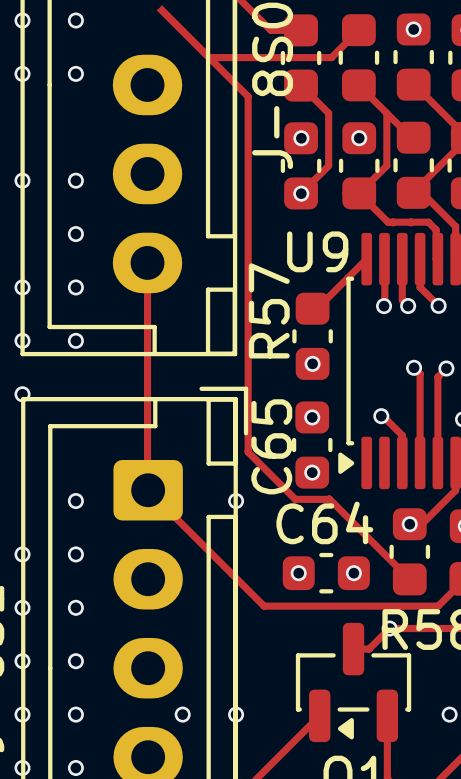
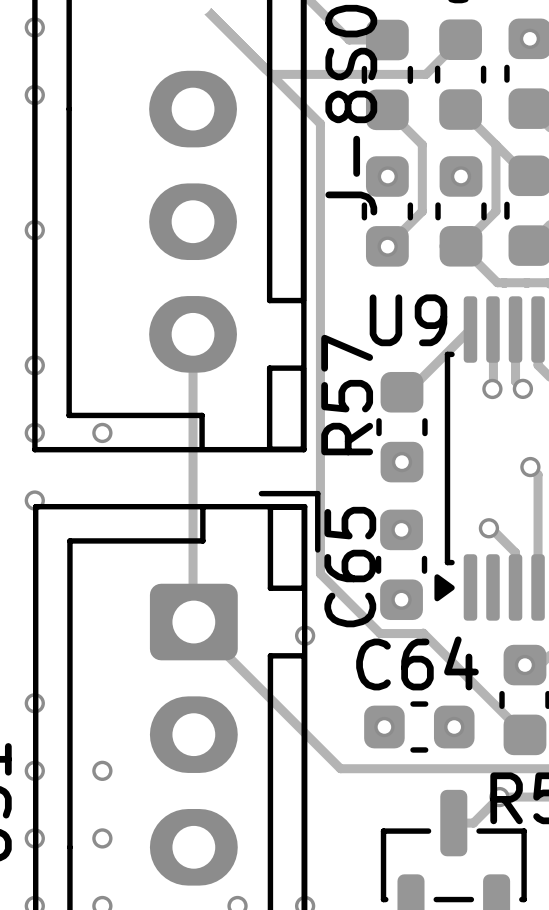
via: (75, 20) -> none
via: (75, 73) -> none
via: (75, 180) -> none
via: (75, 234) -> none
via: (75, 287) -> none
via: (75, 501) -> none
via: (75, 554) -> none

